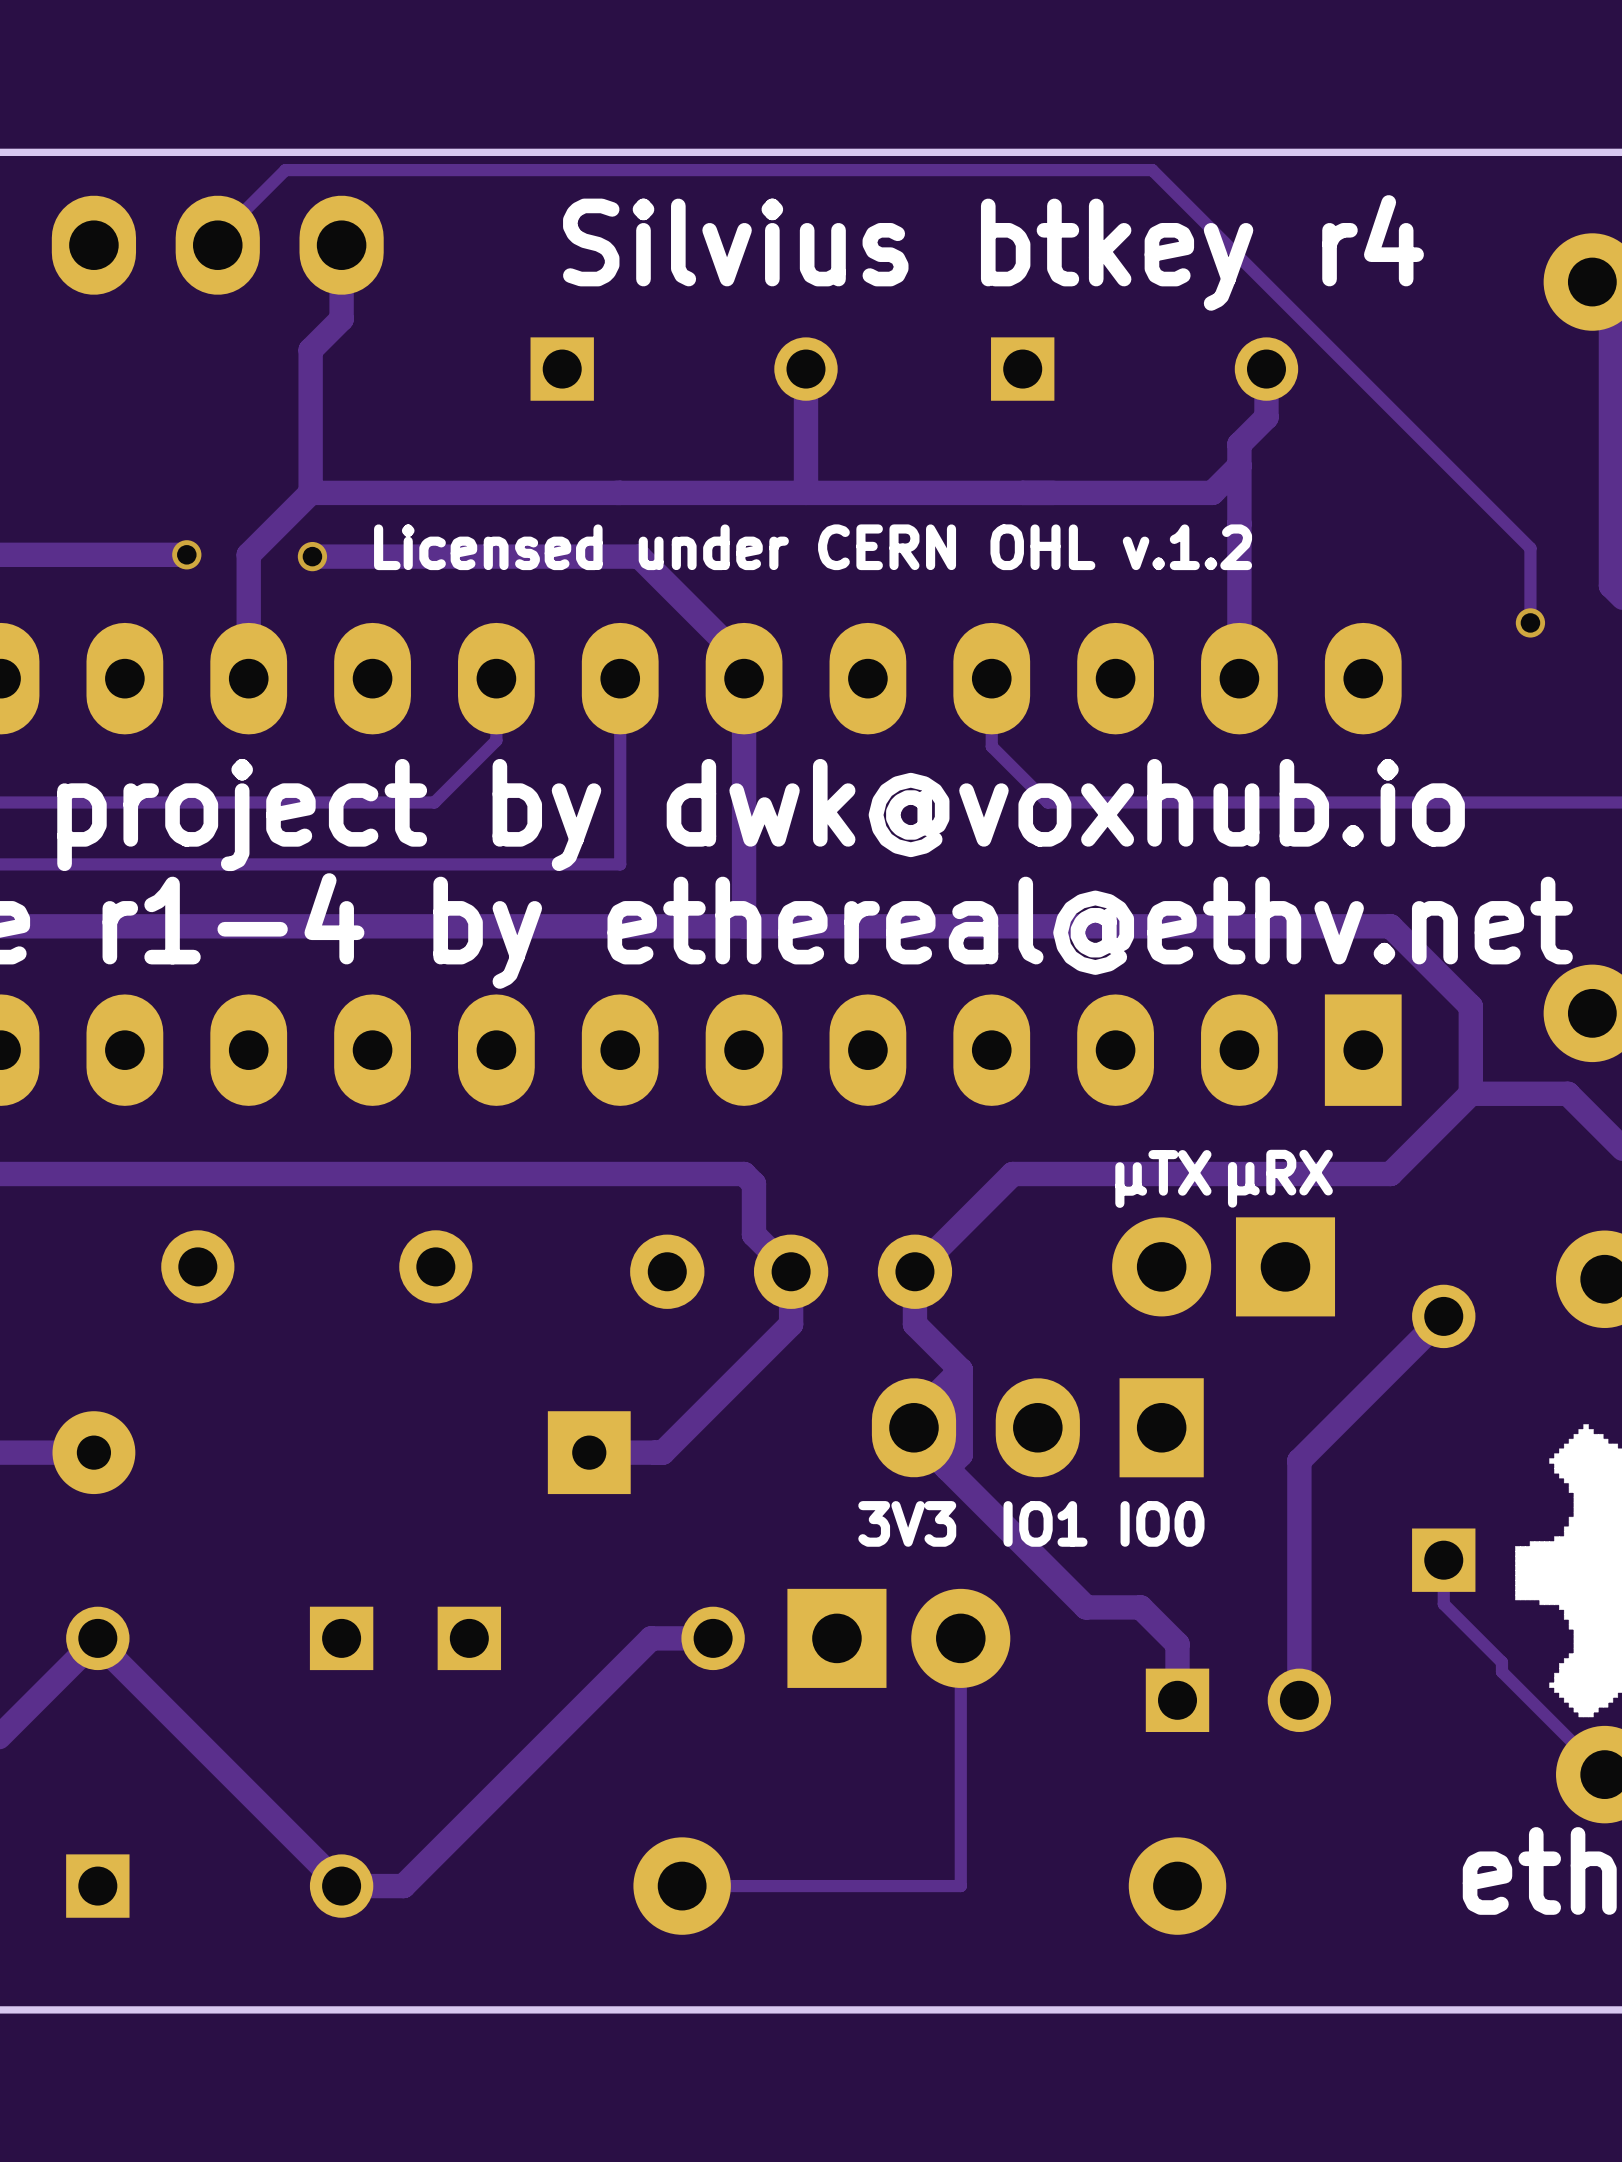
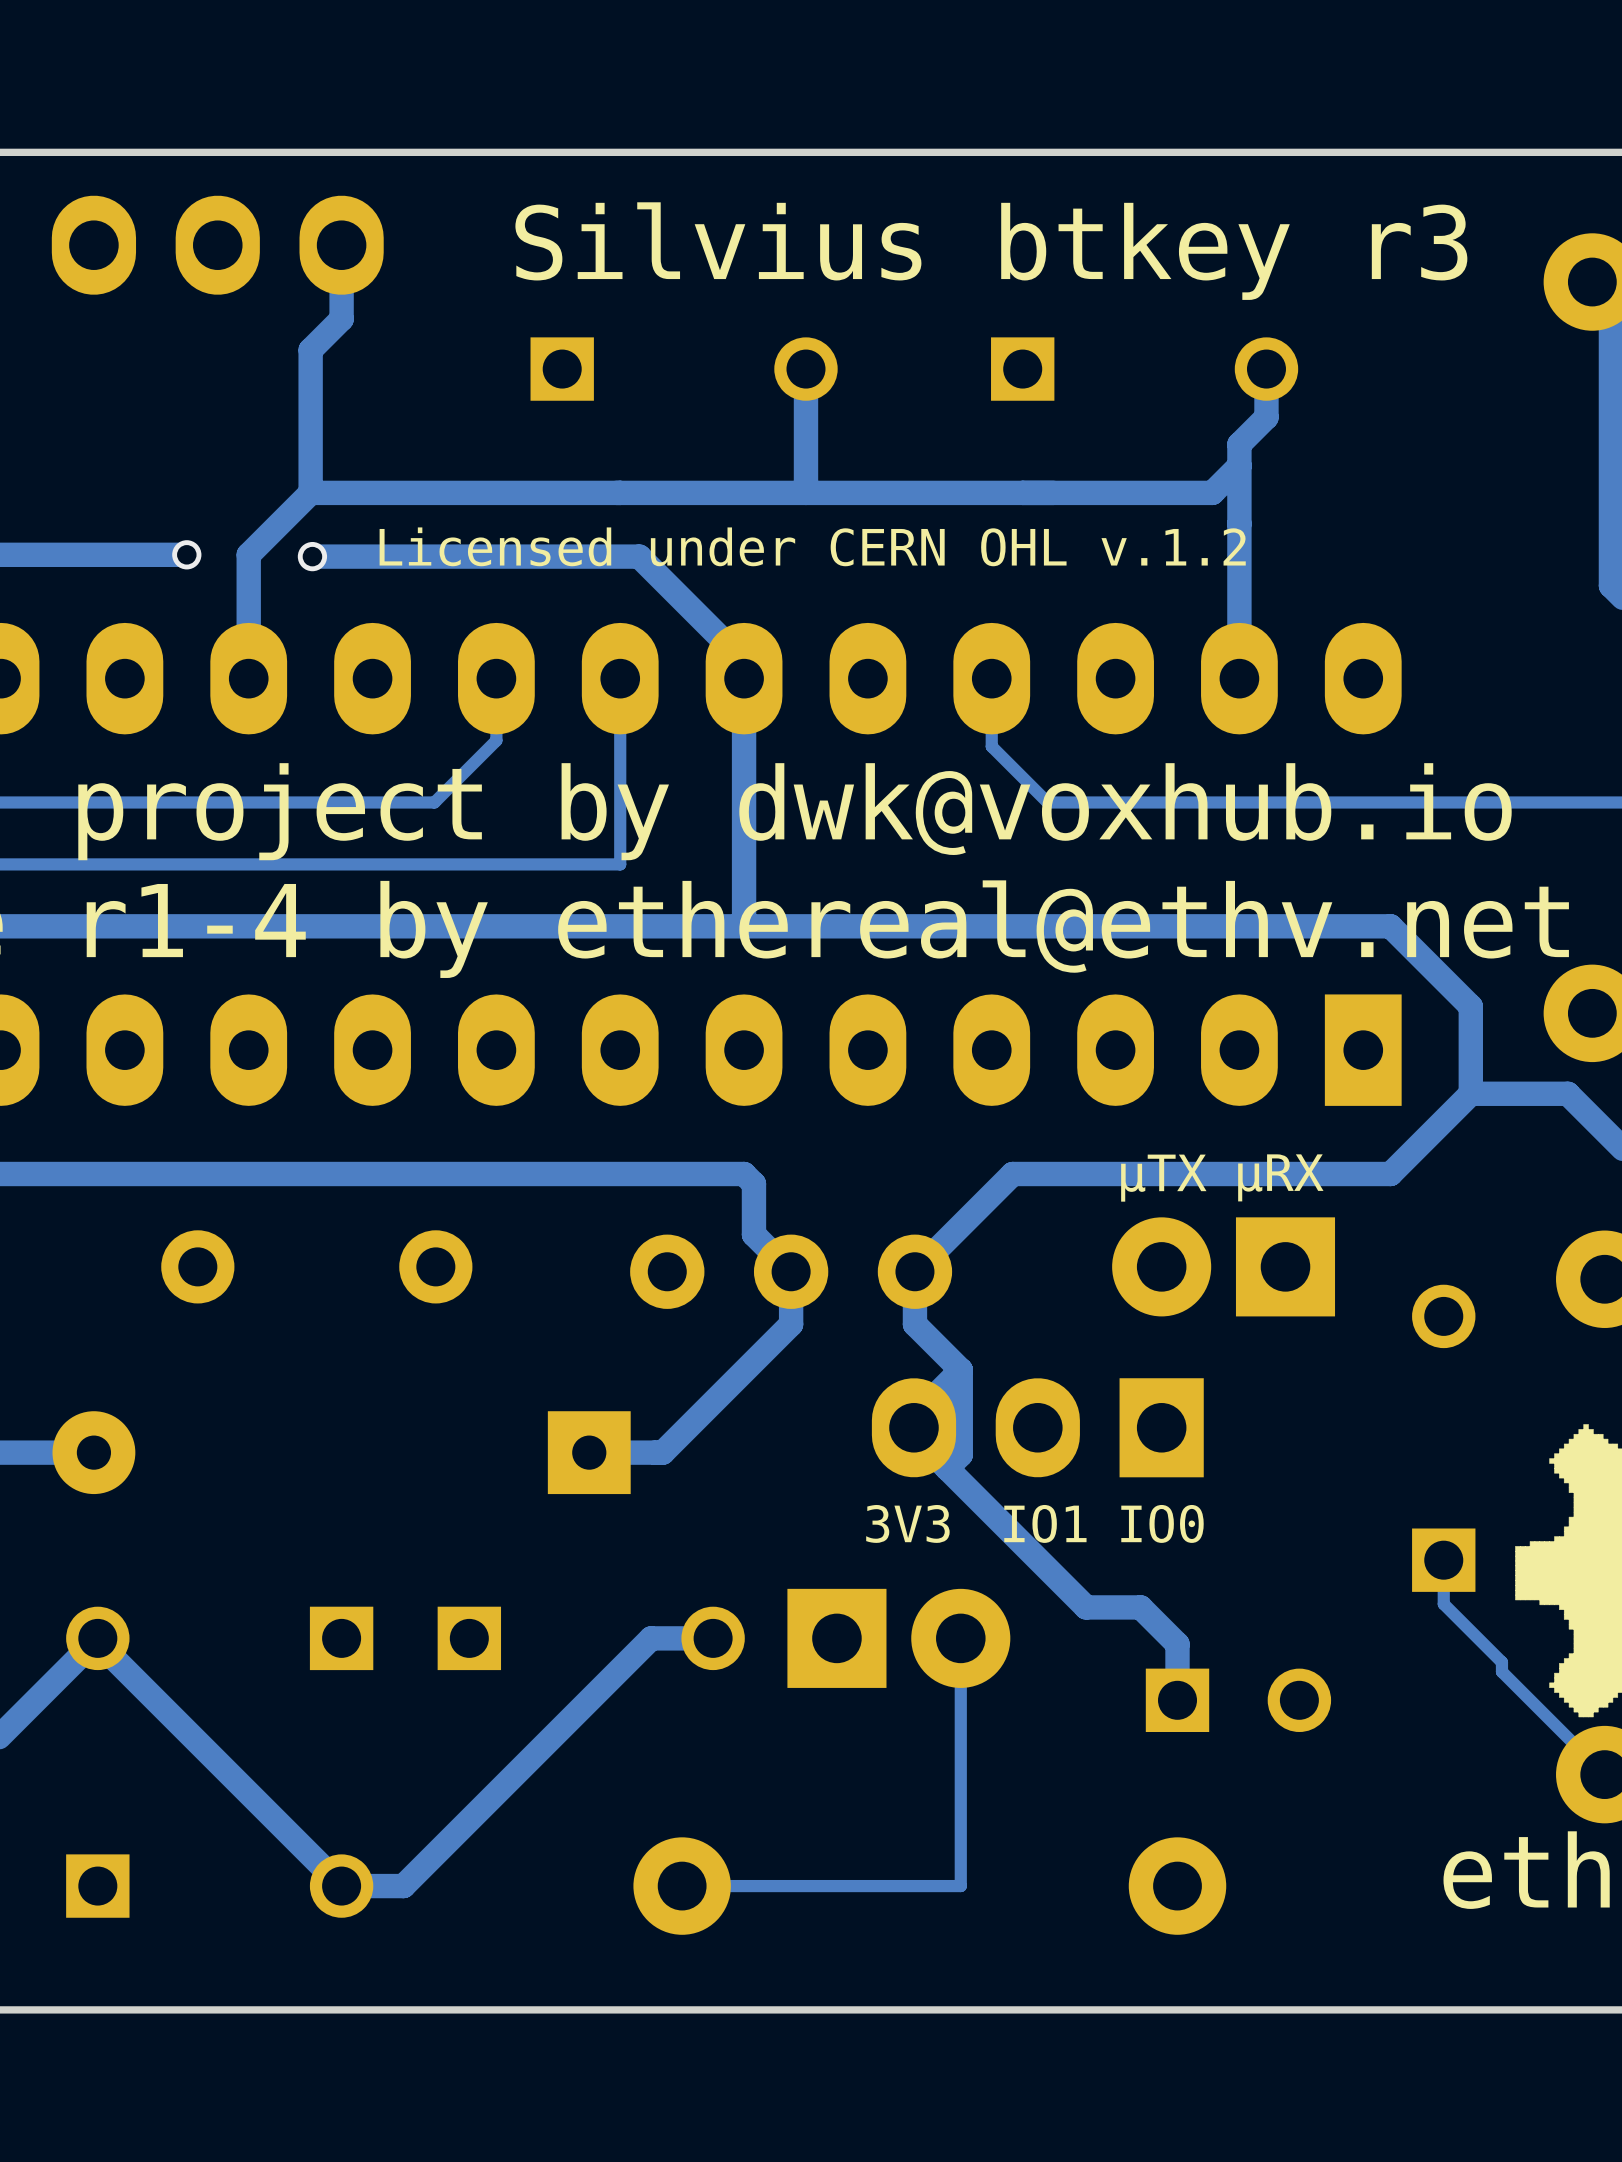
track: (217, 245) (217, 237) (285, 170) (1152, 170) (1530, 548) (1530, 622) -> none
text: Silvius btkey r4 (993, 252) -> Silvius btkey r3 (991, 251)
via: (1530, 622) -> none
track: (1443, 1316) (1299, 1460) (1299, 1700) -> none

